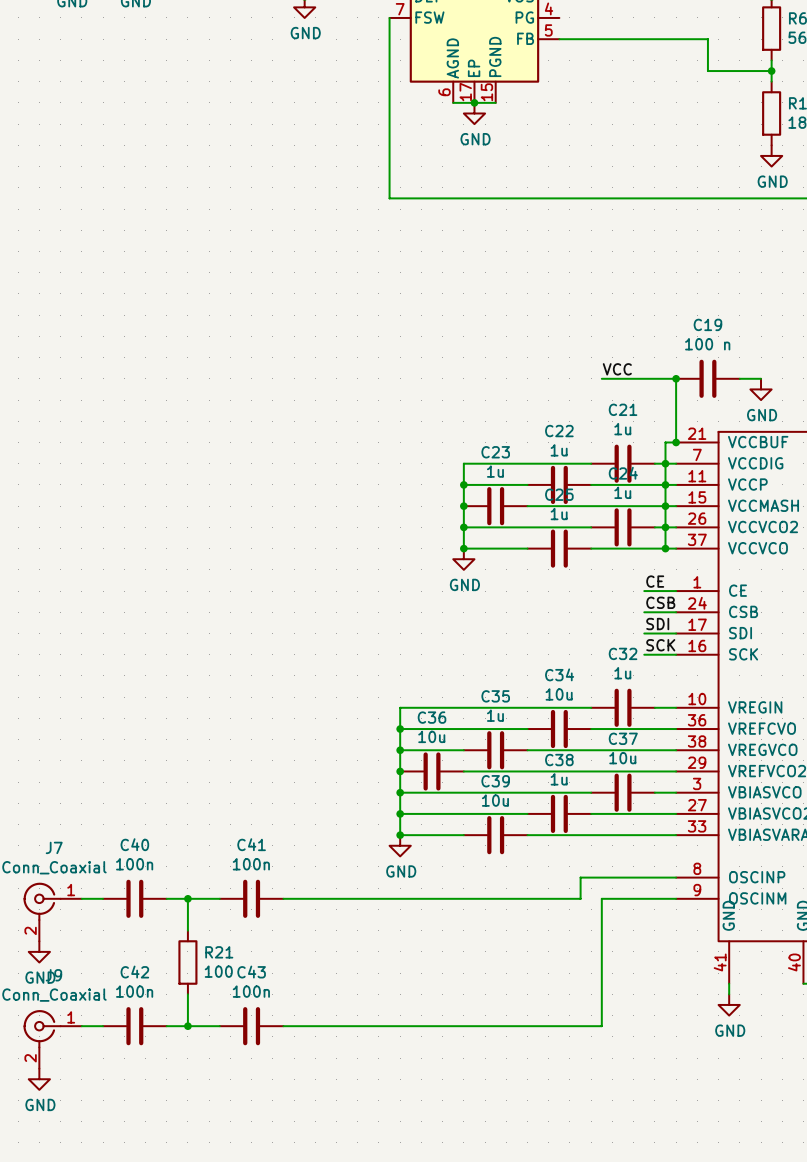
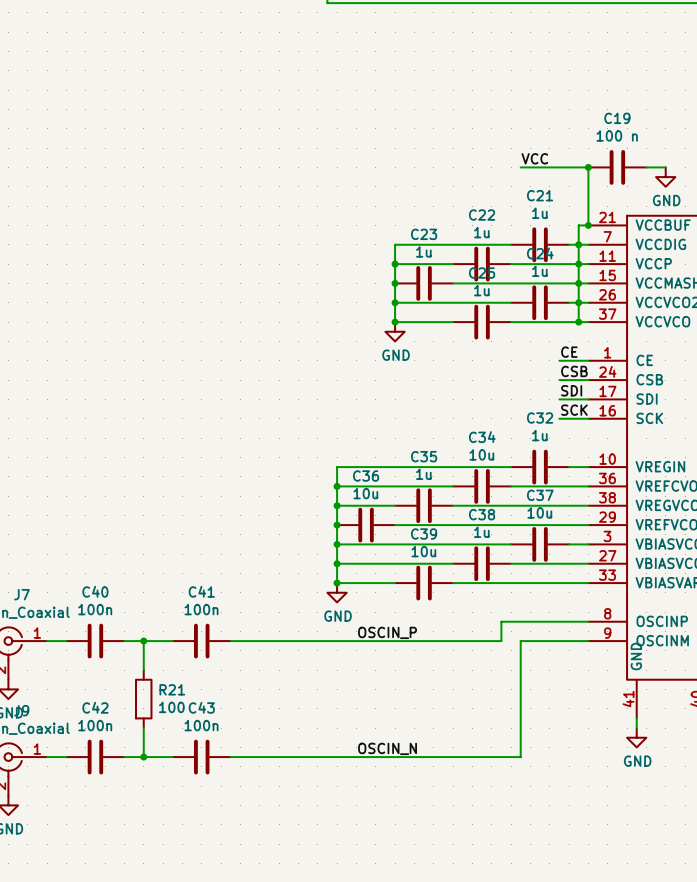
label: none -> OSCIN_P (387, 632)
label: none -> OSCIN_N (387, 748)

